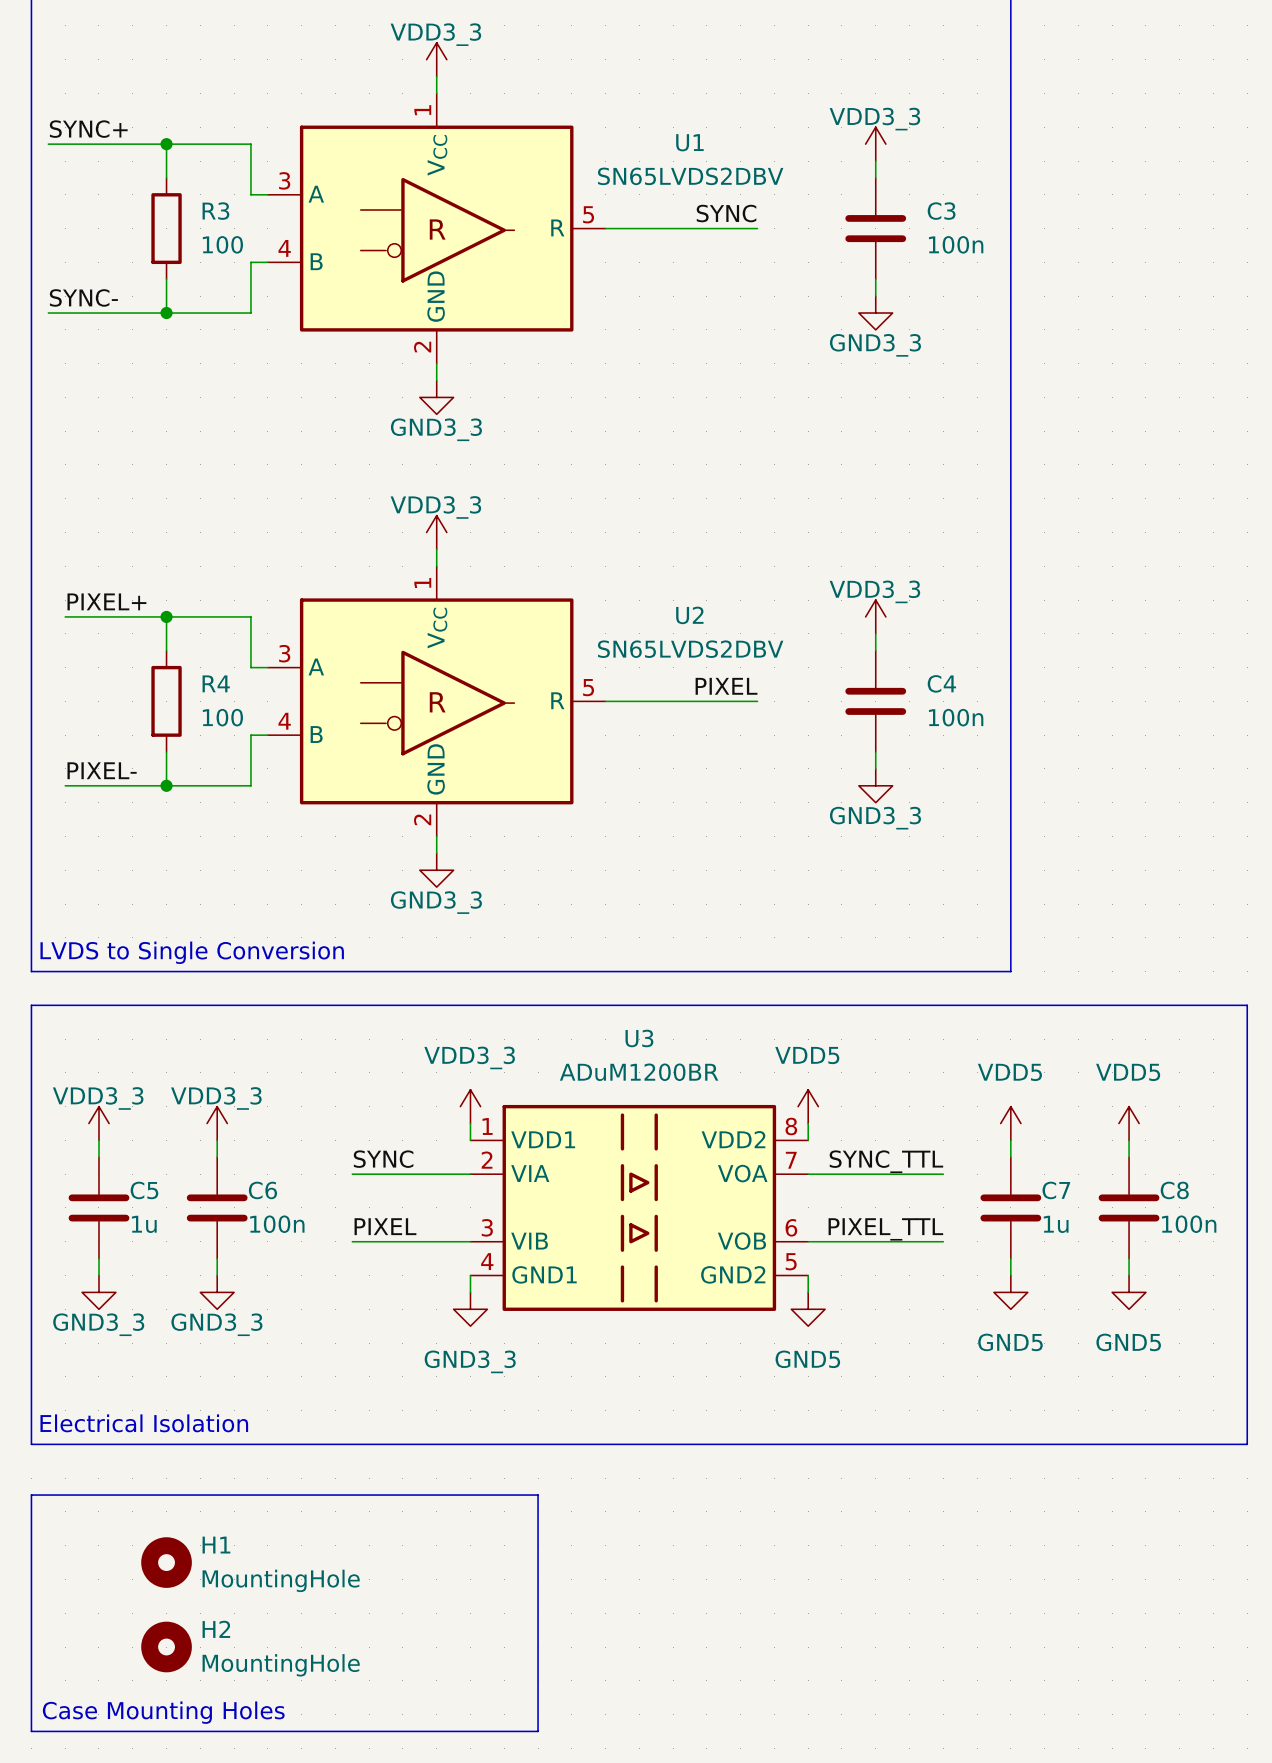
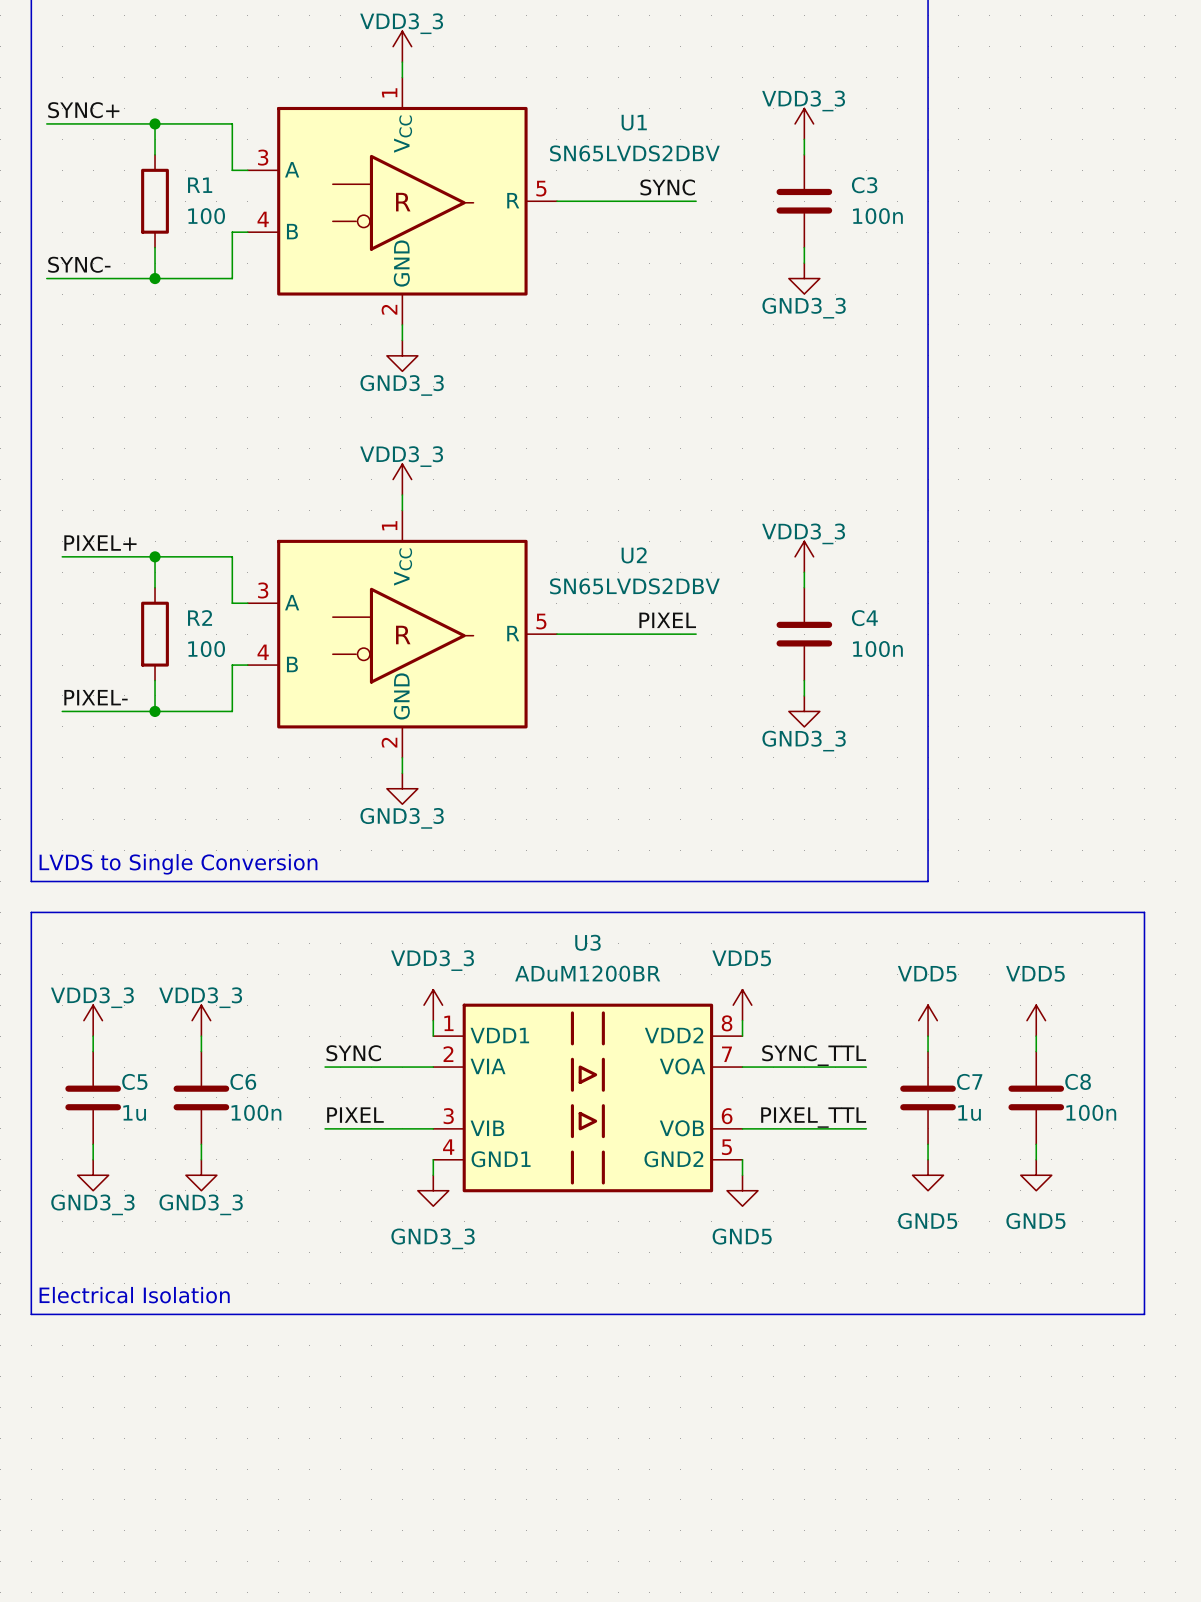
R3 name: R3 (215, 211) -> R1 (200, 185)
R4 name: R4 (216, 683) -> R2 (200, 617)
line: (31, 1495) (538, 1495) (538, 1731) (31, 1731) (31, 1495) -> none
H1: MountingHole (166, 1562) -> none
H2: MountingHole (166, 1647) -> none
text: Case Mounting Holes (163, 1712) -> none

